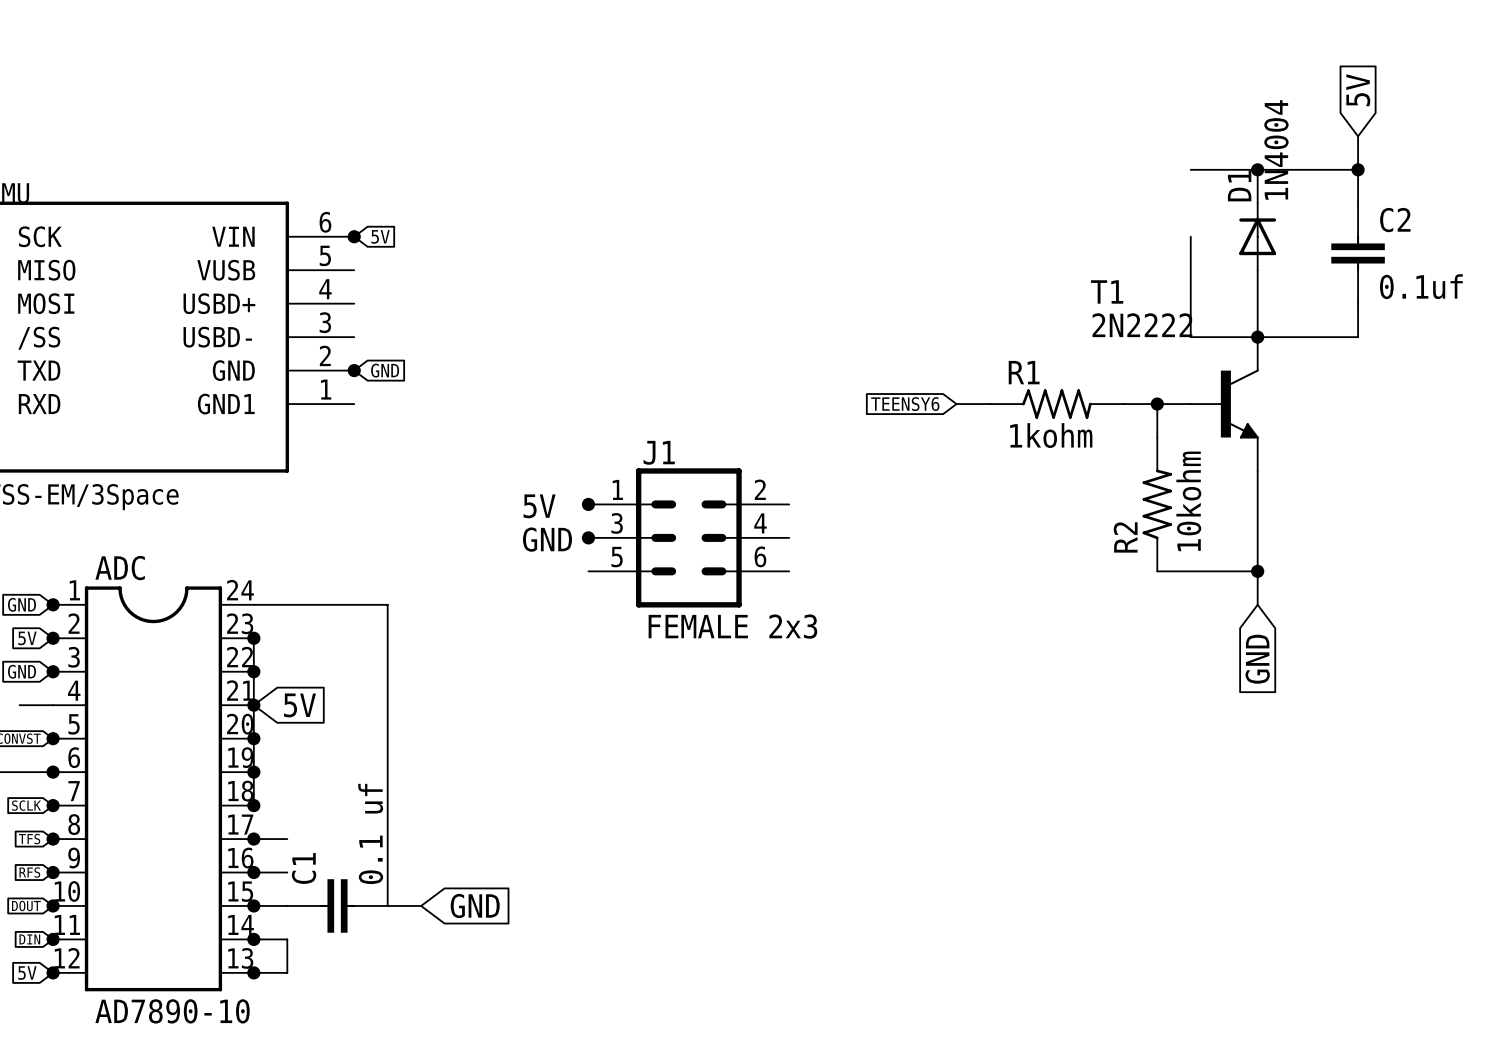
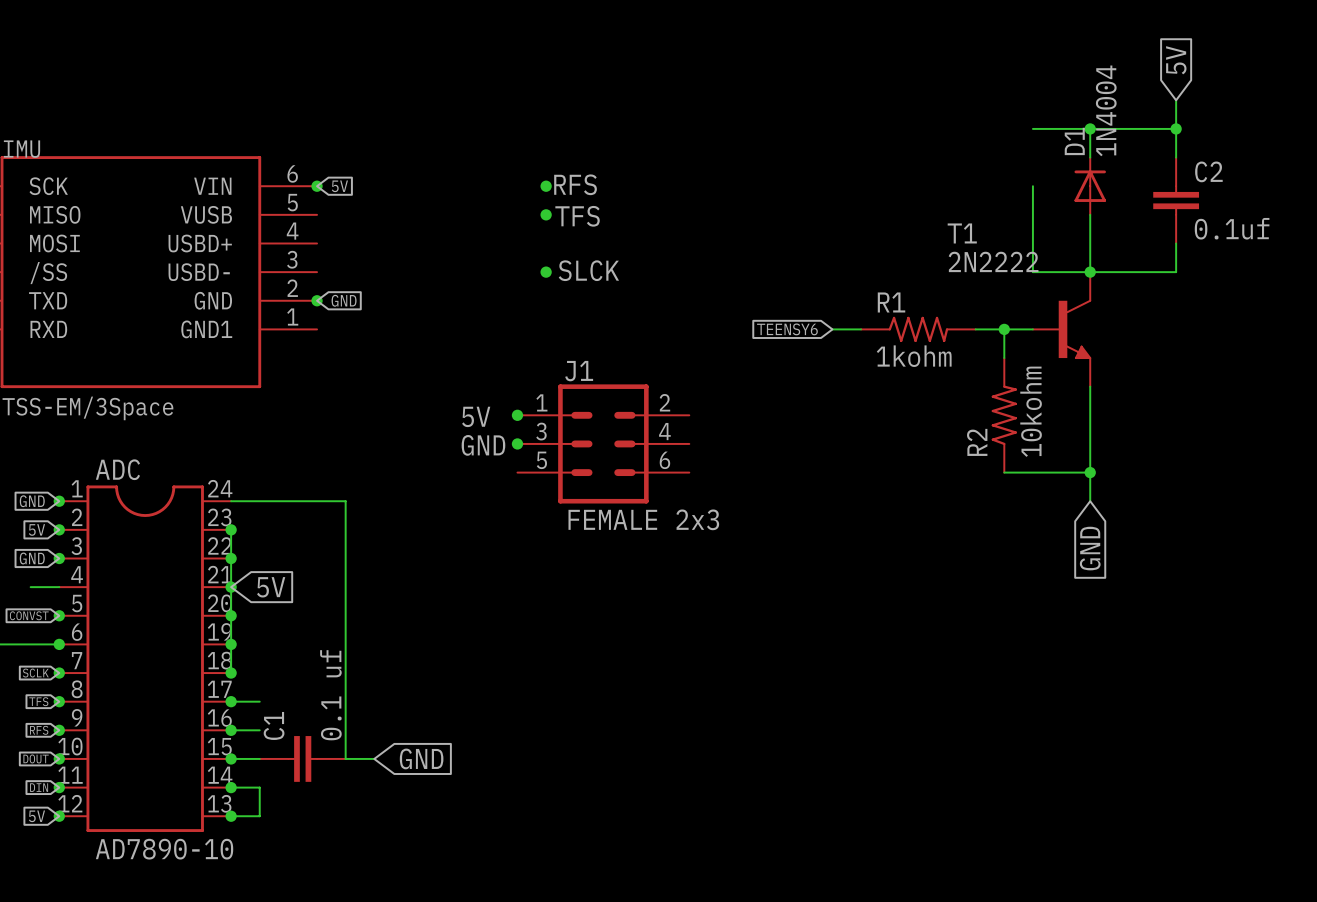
label: none -> RFS (575, 184)
junction: none -> (546, 186)
junction: none -> (546, 214)
label: none -> TFS (577, 216)
label: none -> SLCK (588, 270)
junction: none -> (546, 272)

